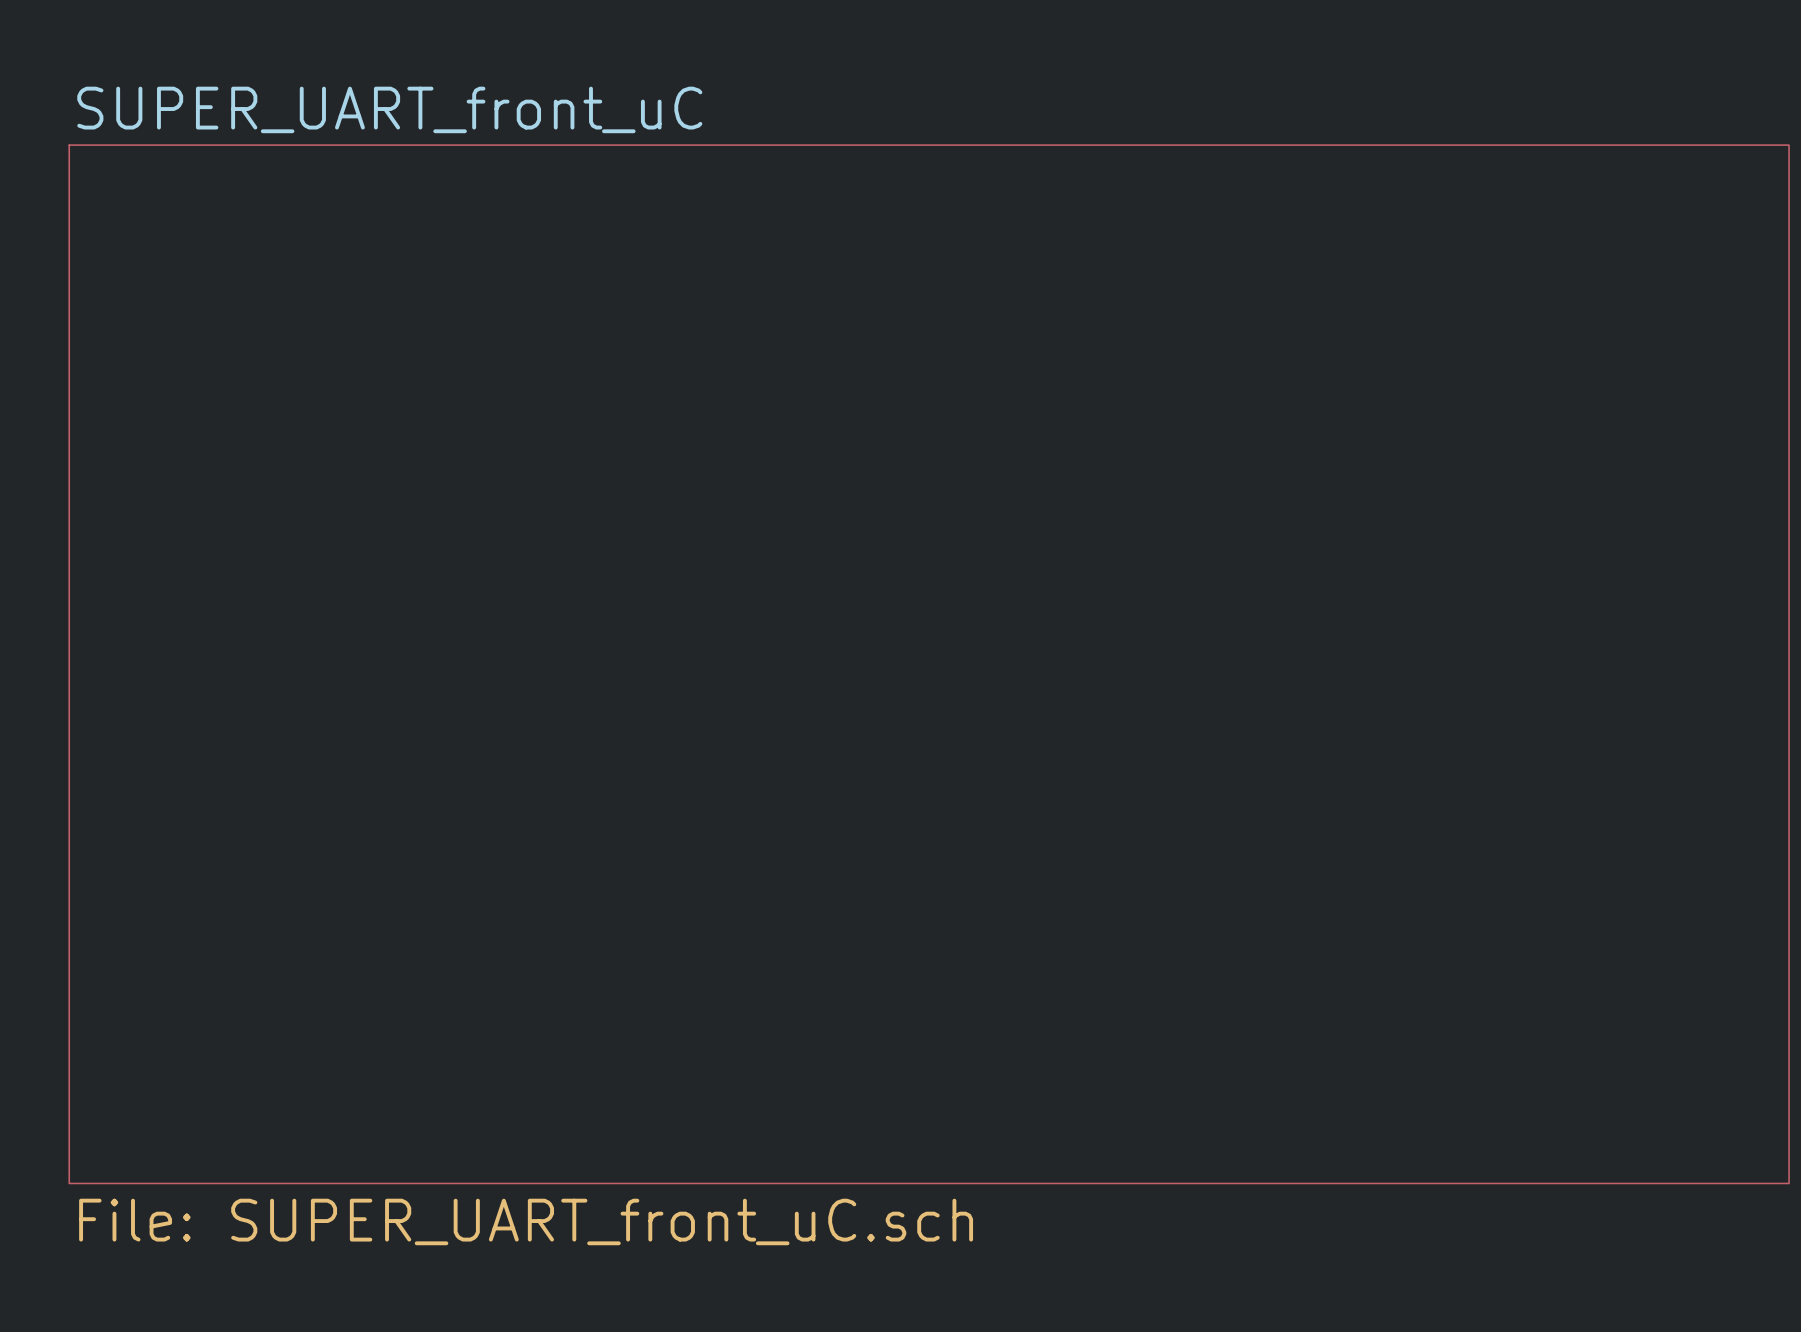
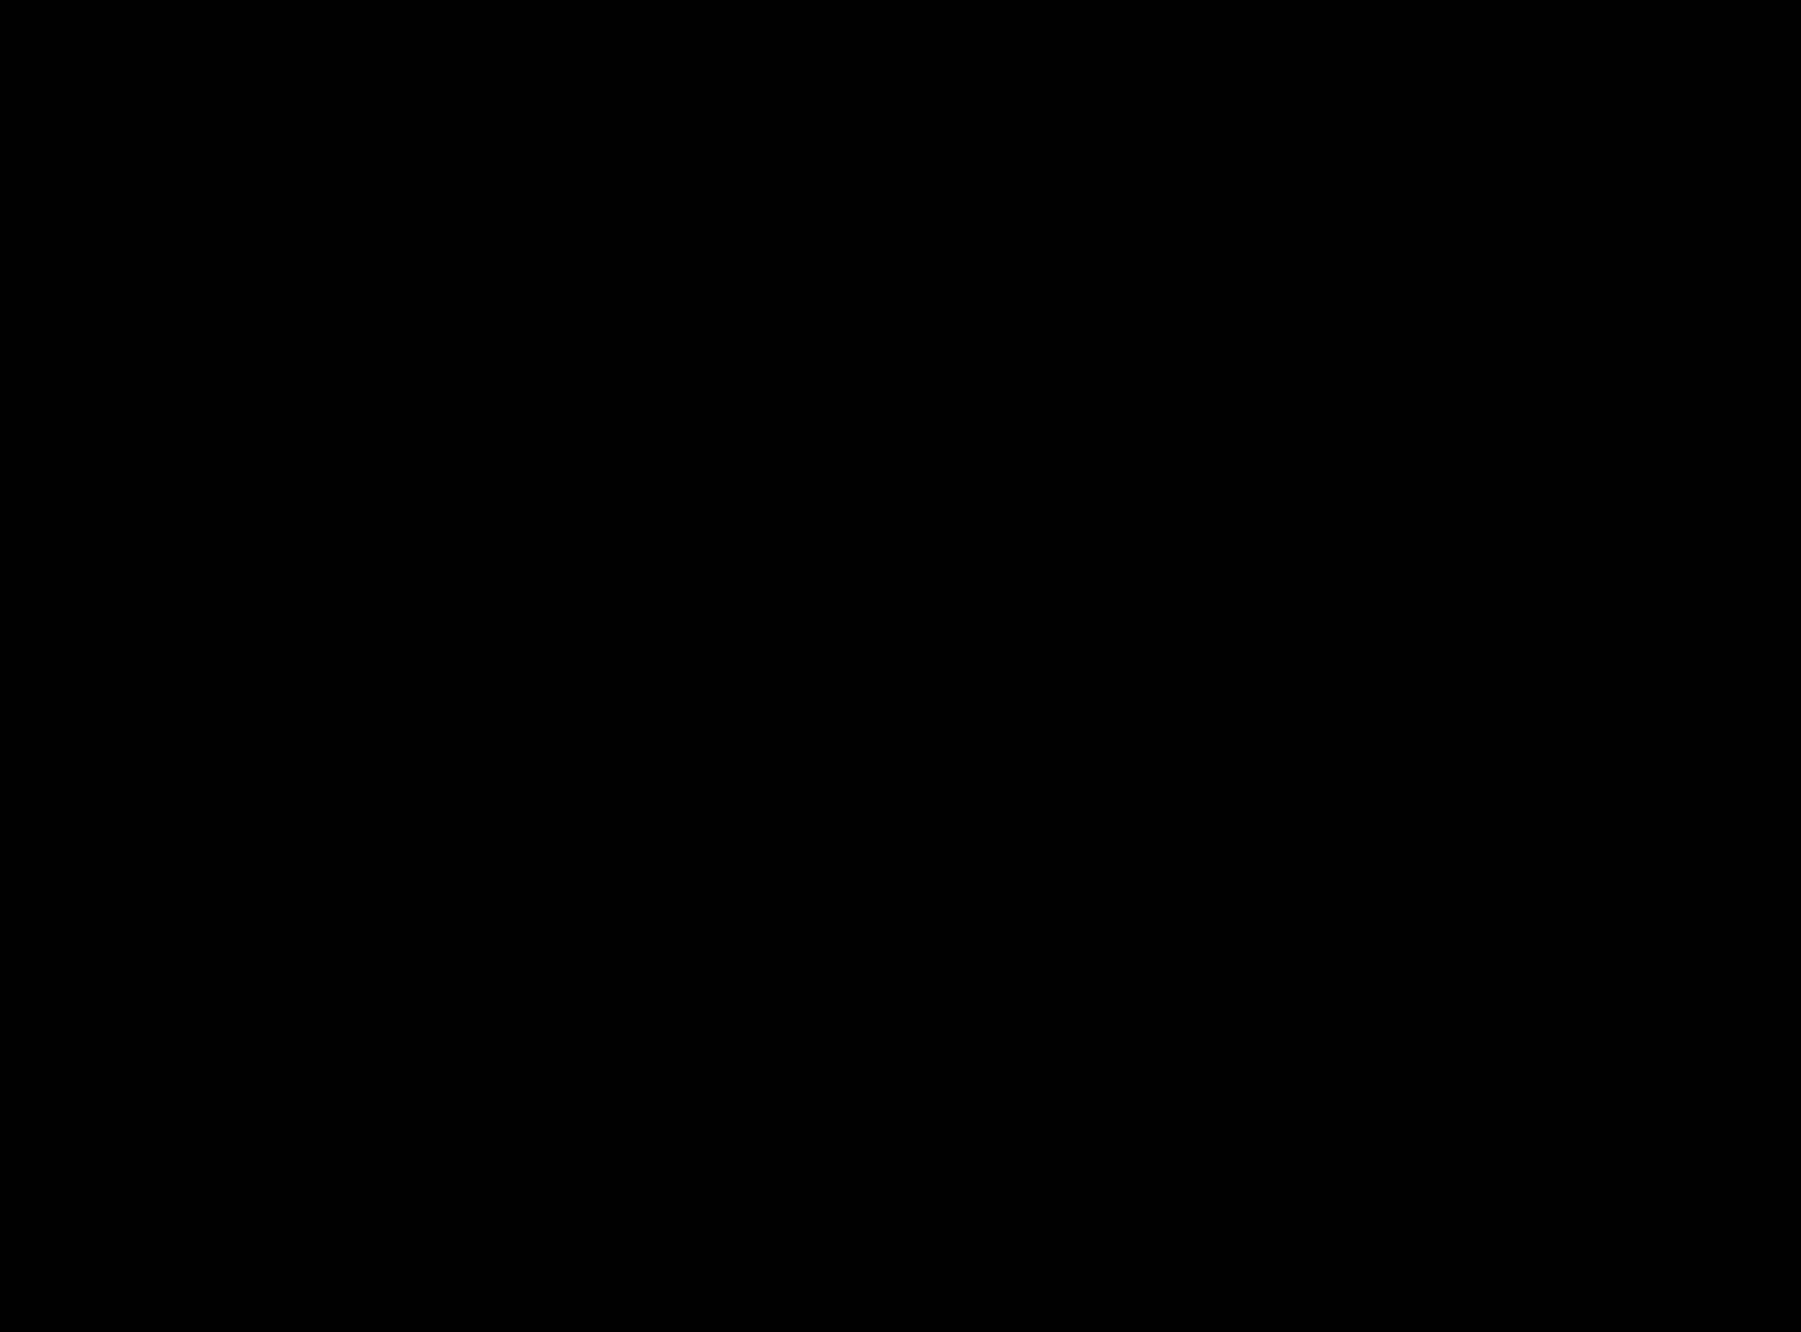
sheet SUPER_UART_front_uC: File: SUPER_UART_front_uC.sch (929, 664) -> none

